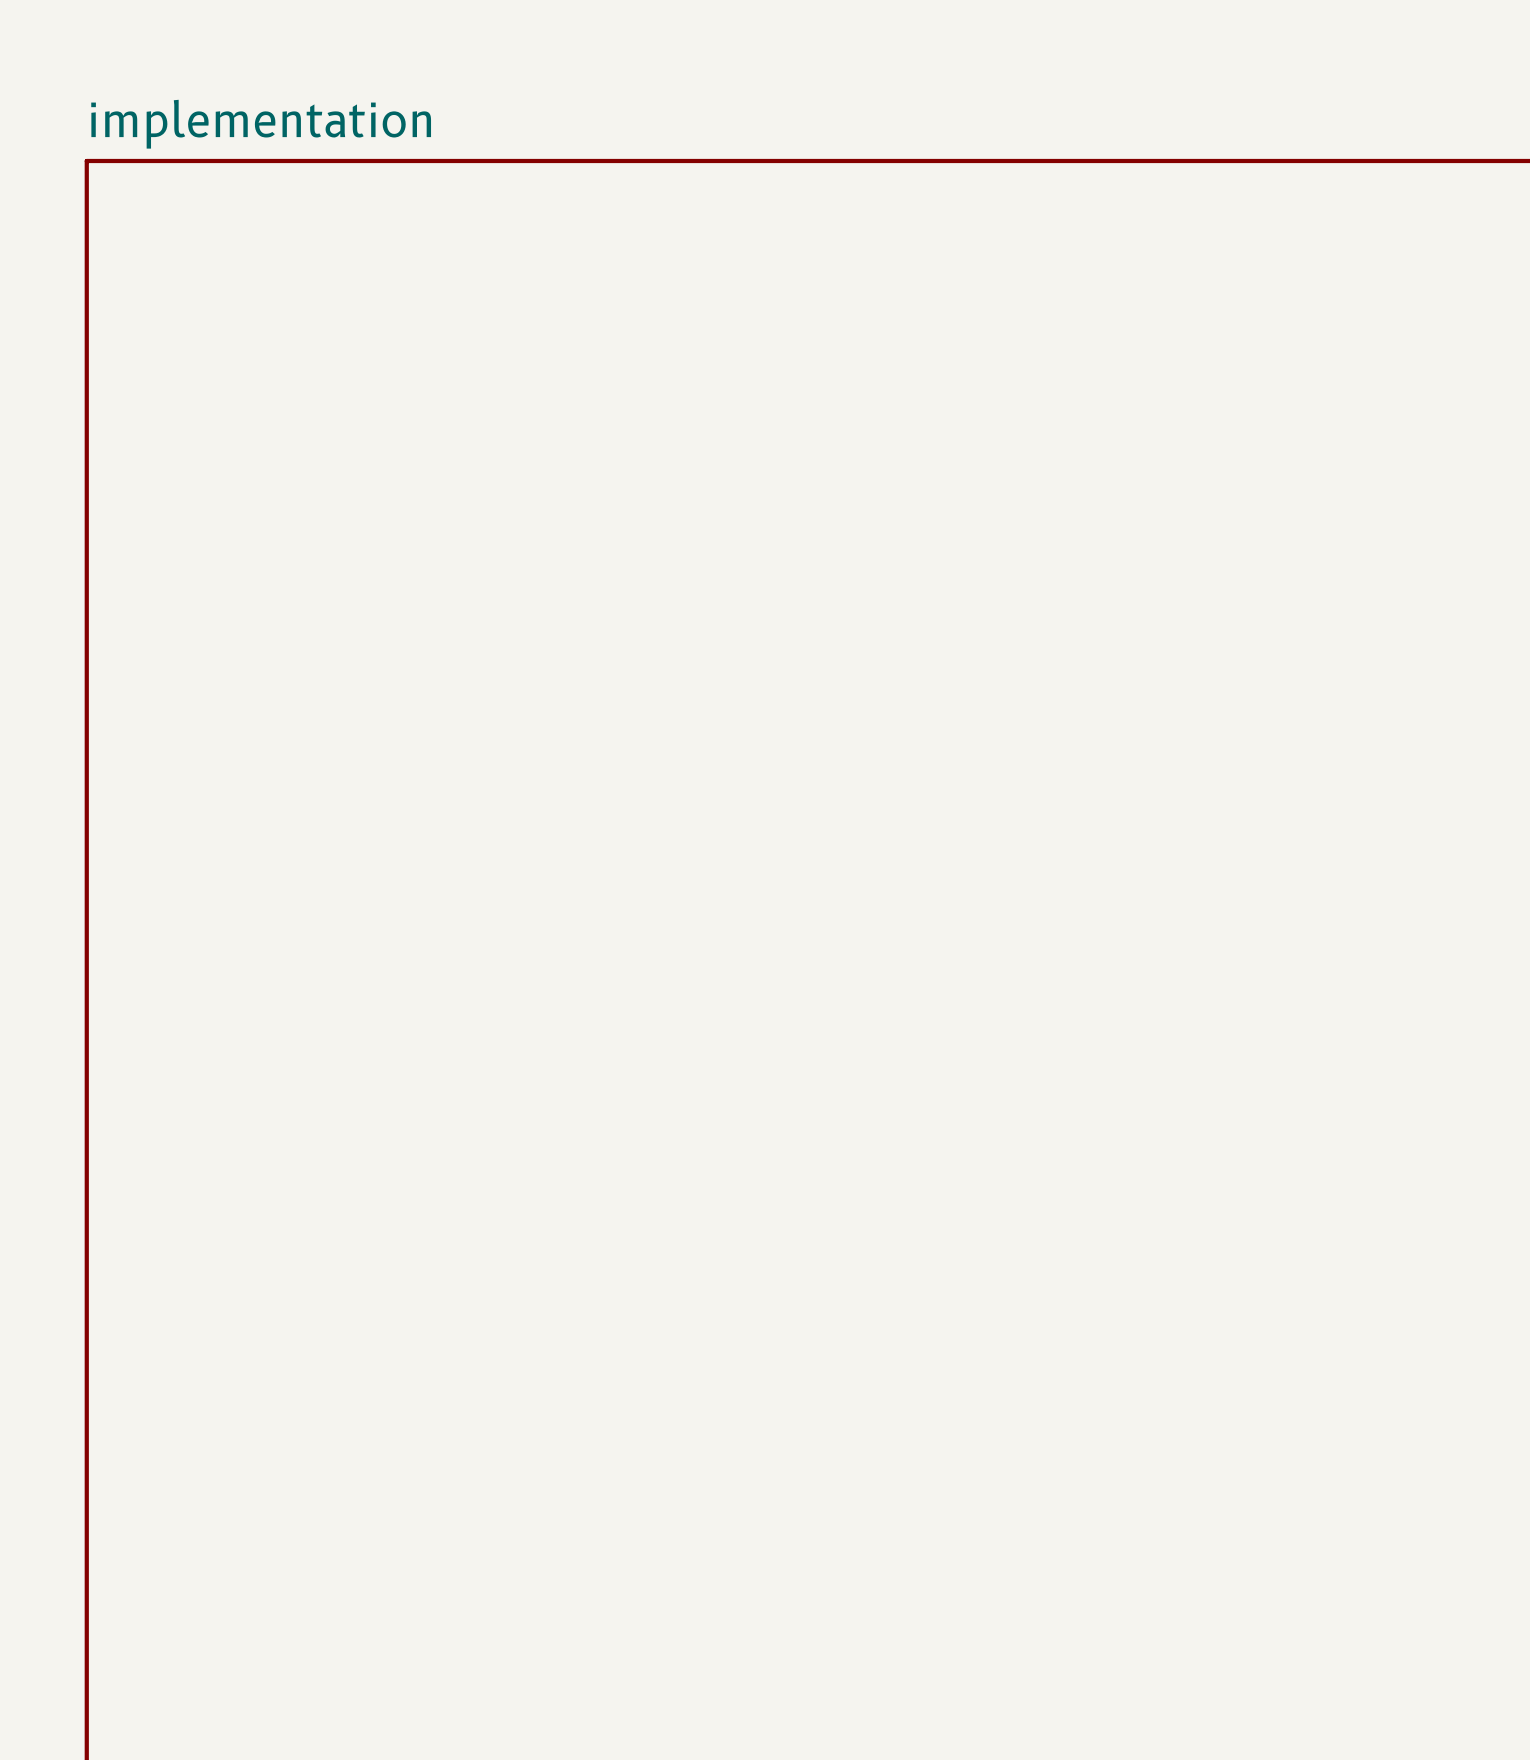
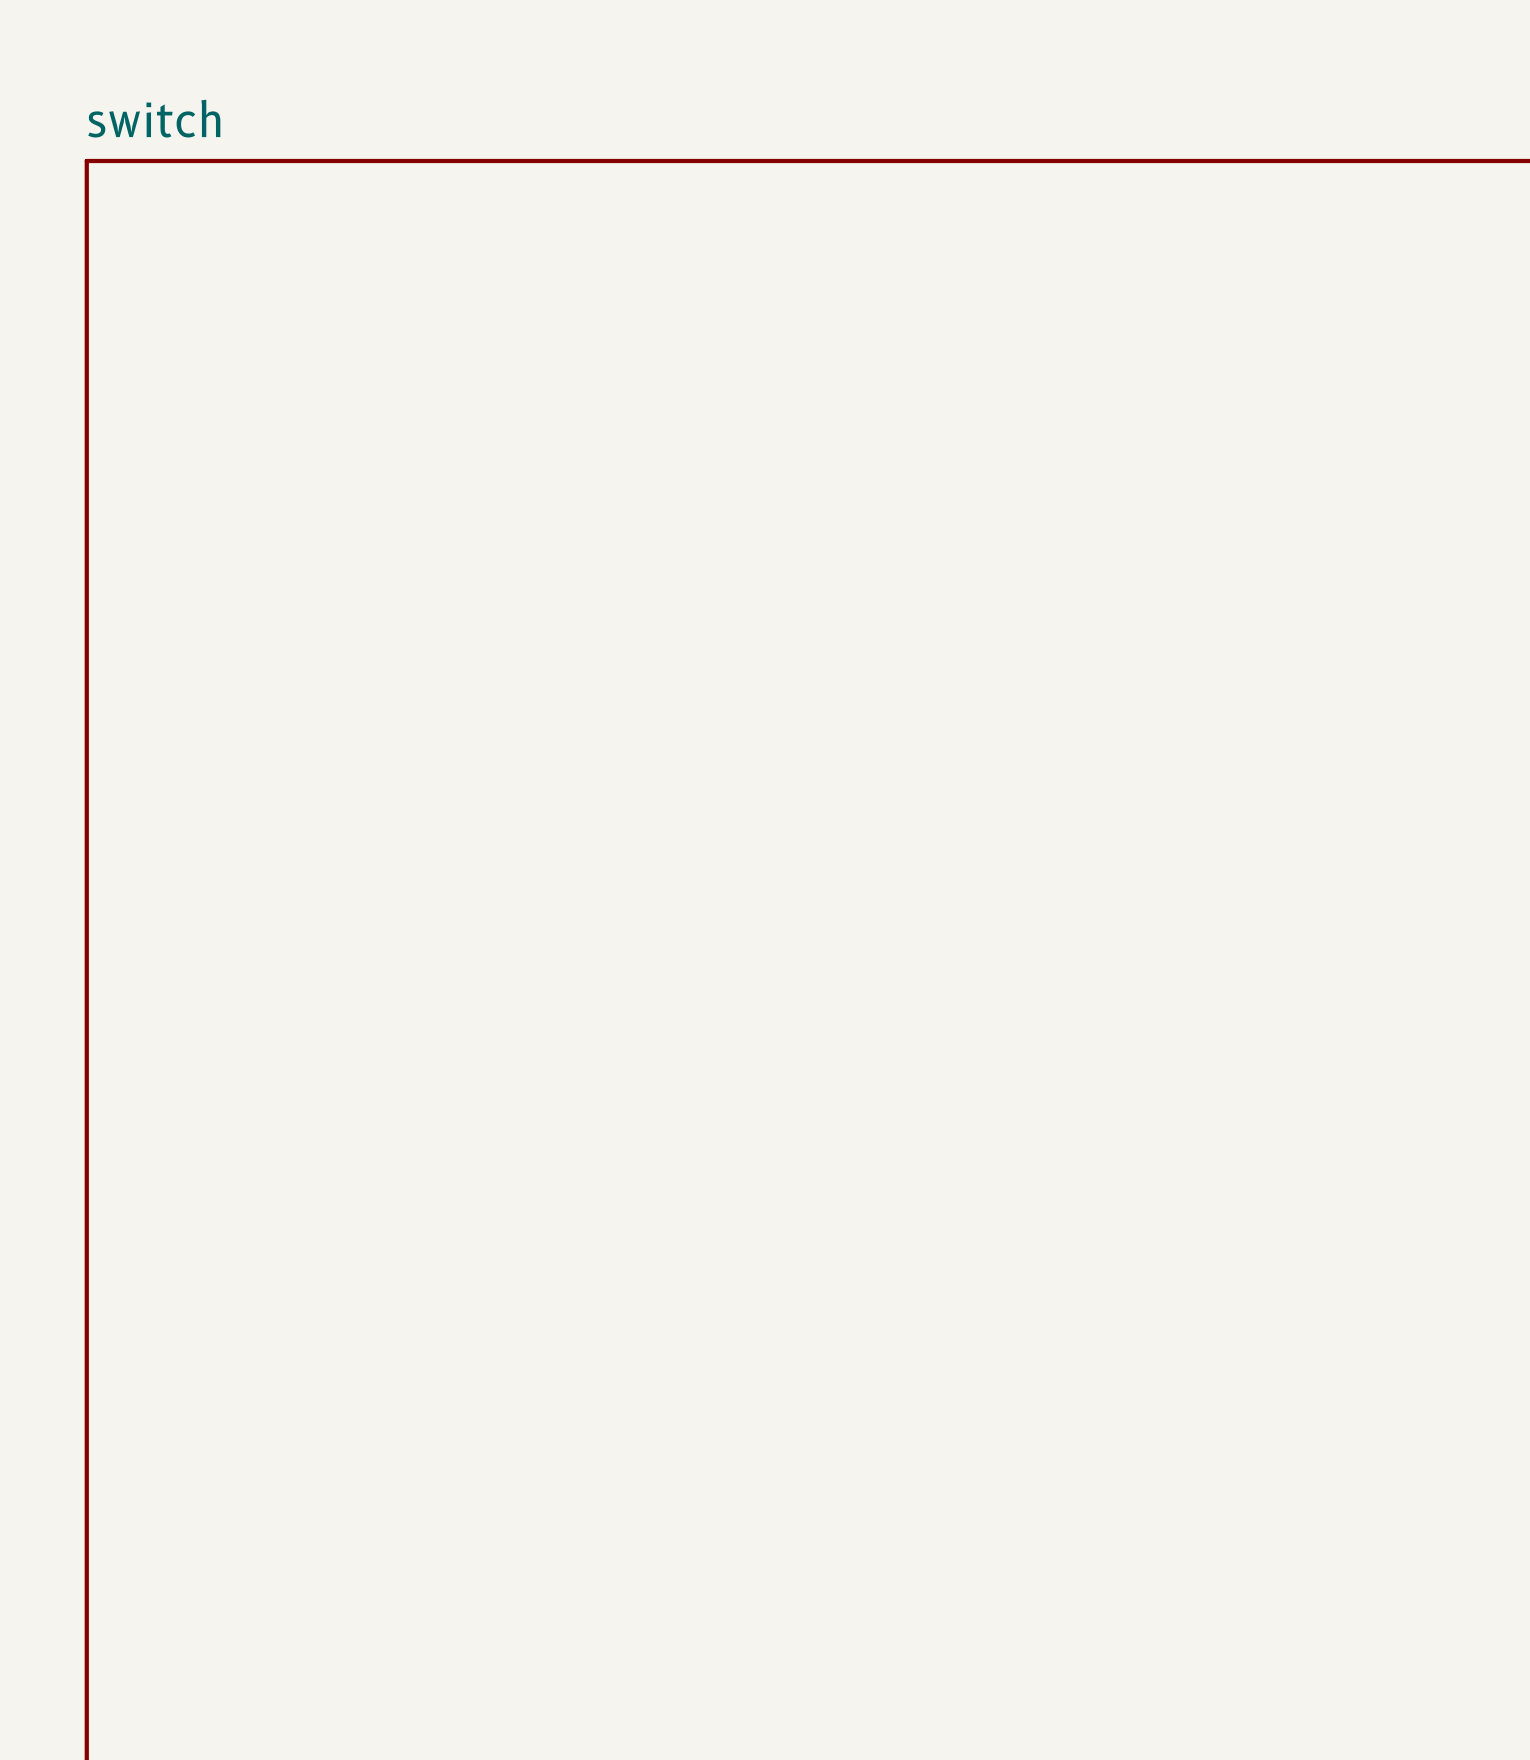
sheet implementation name: implementation (261, 124) -> switch (154, 118)

